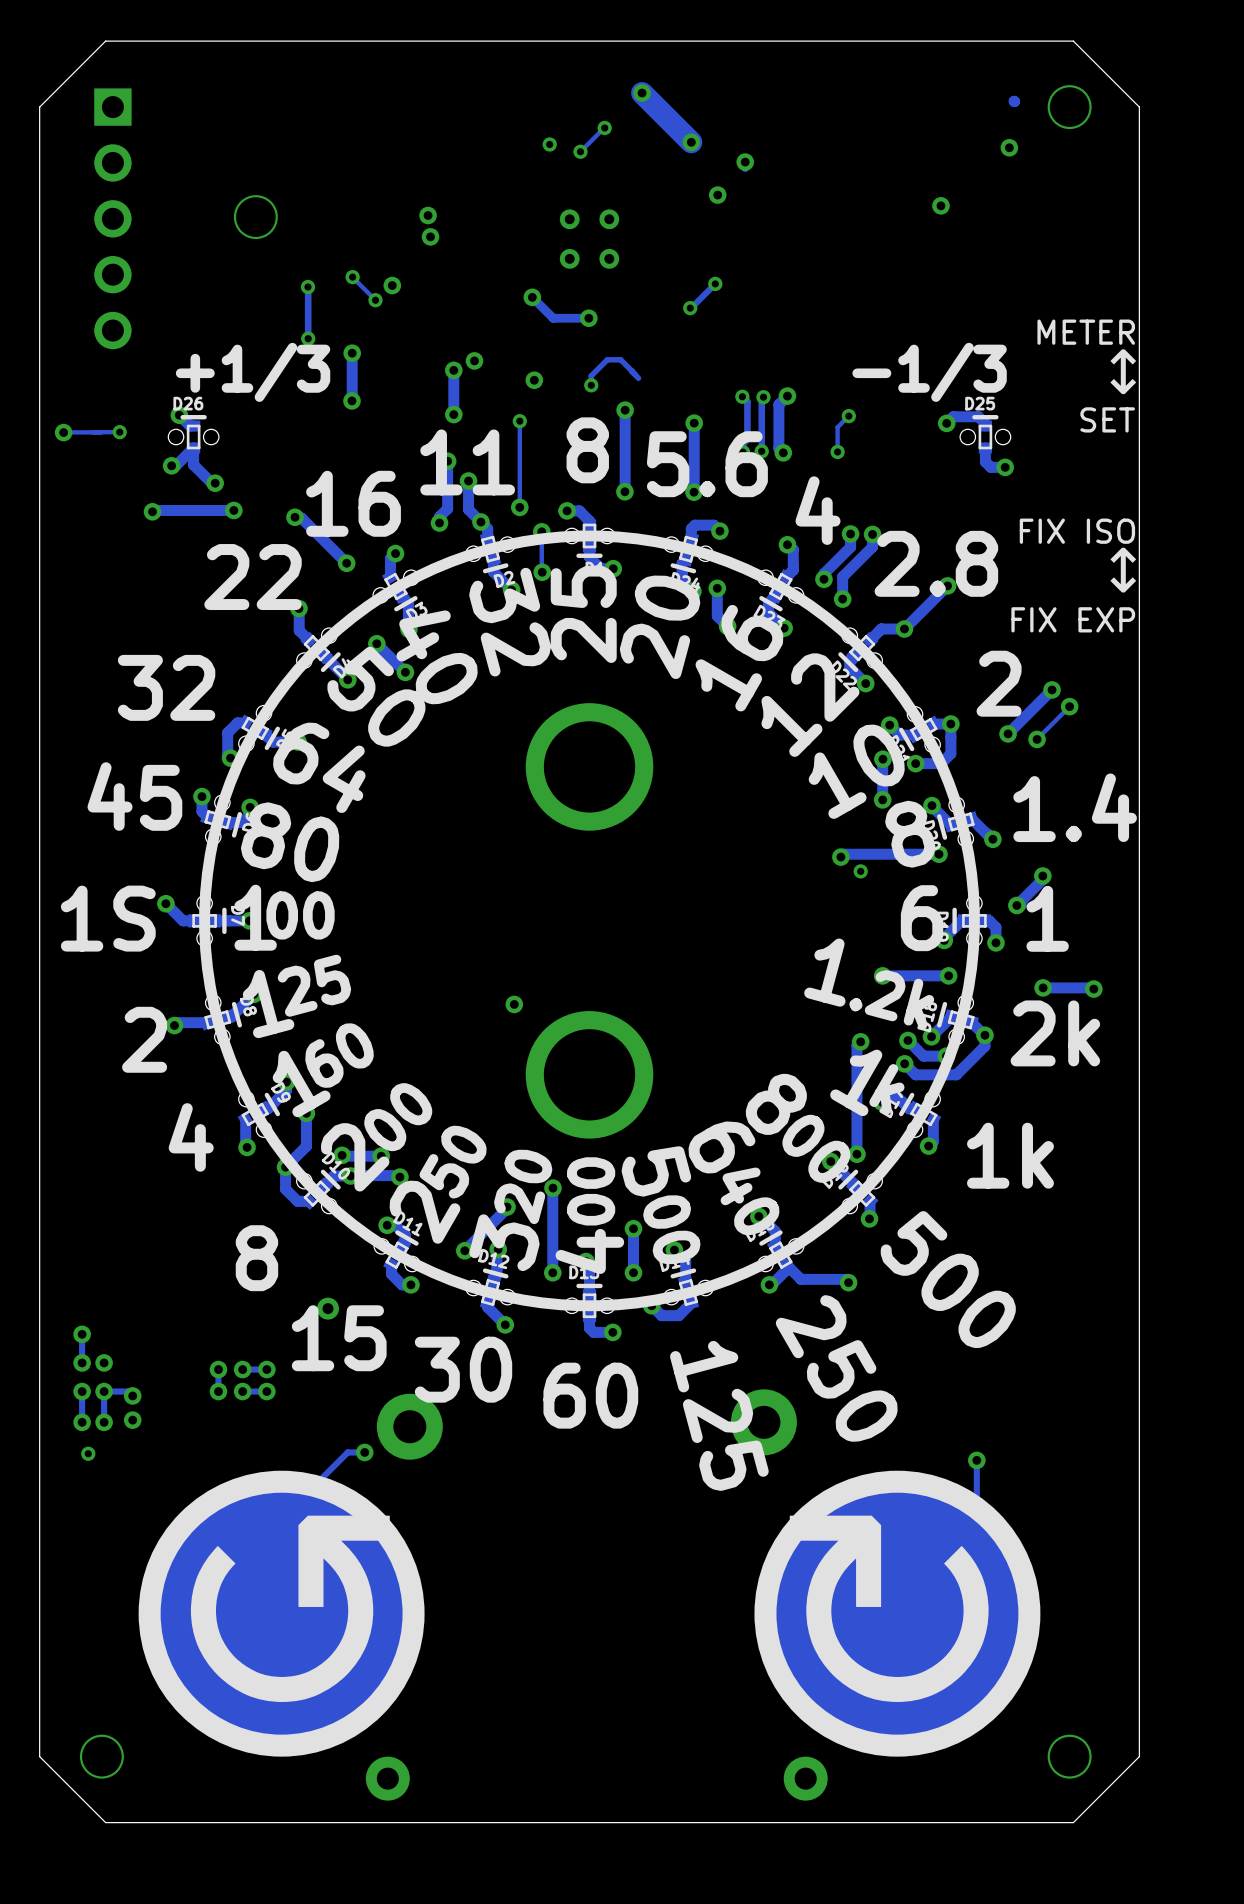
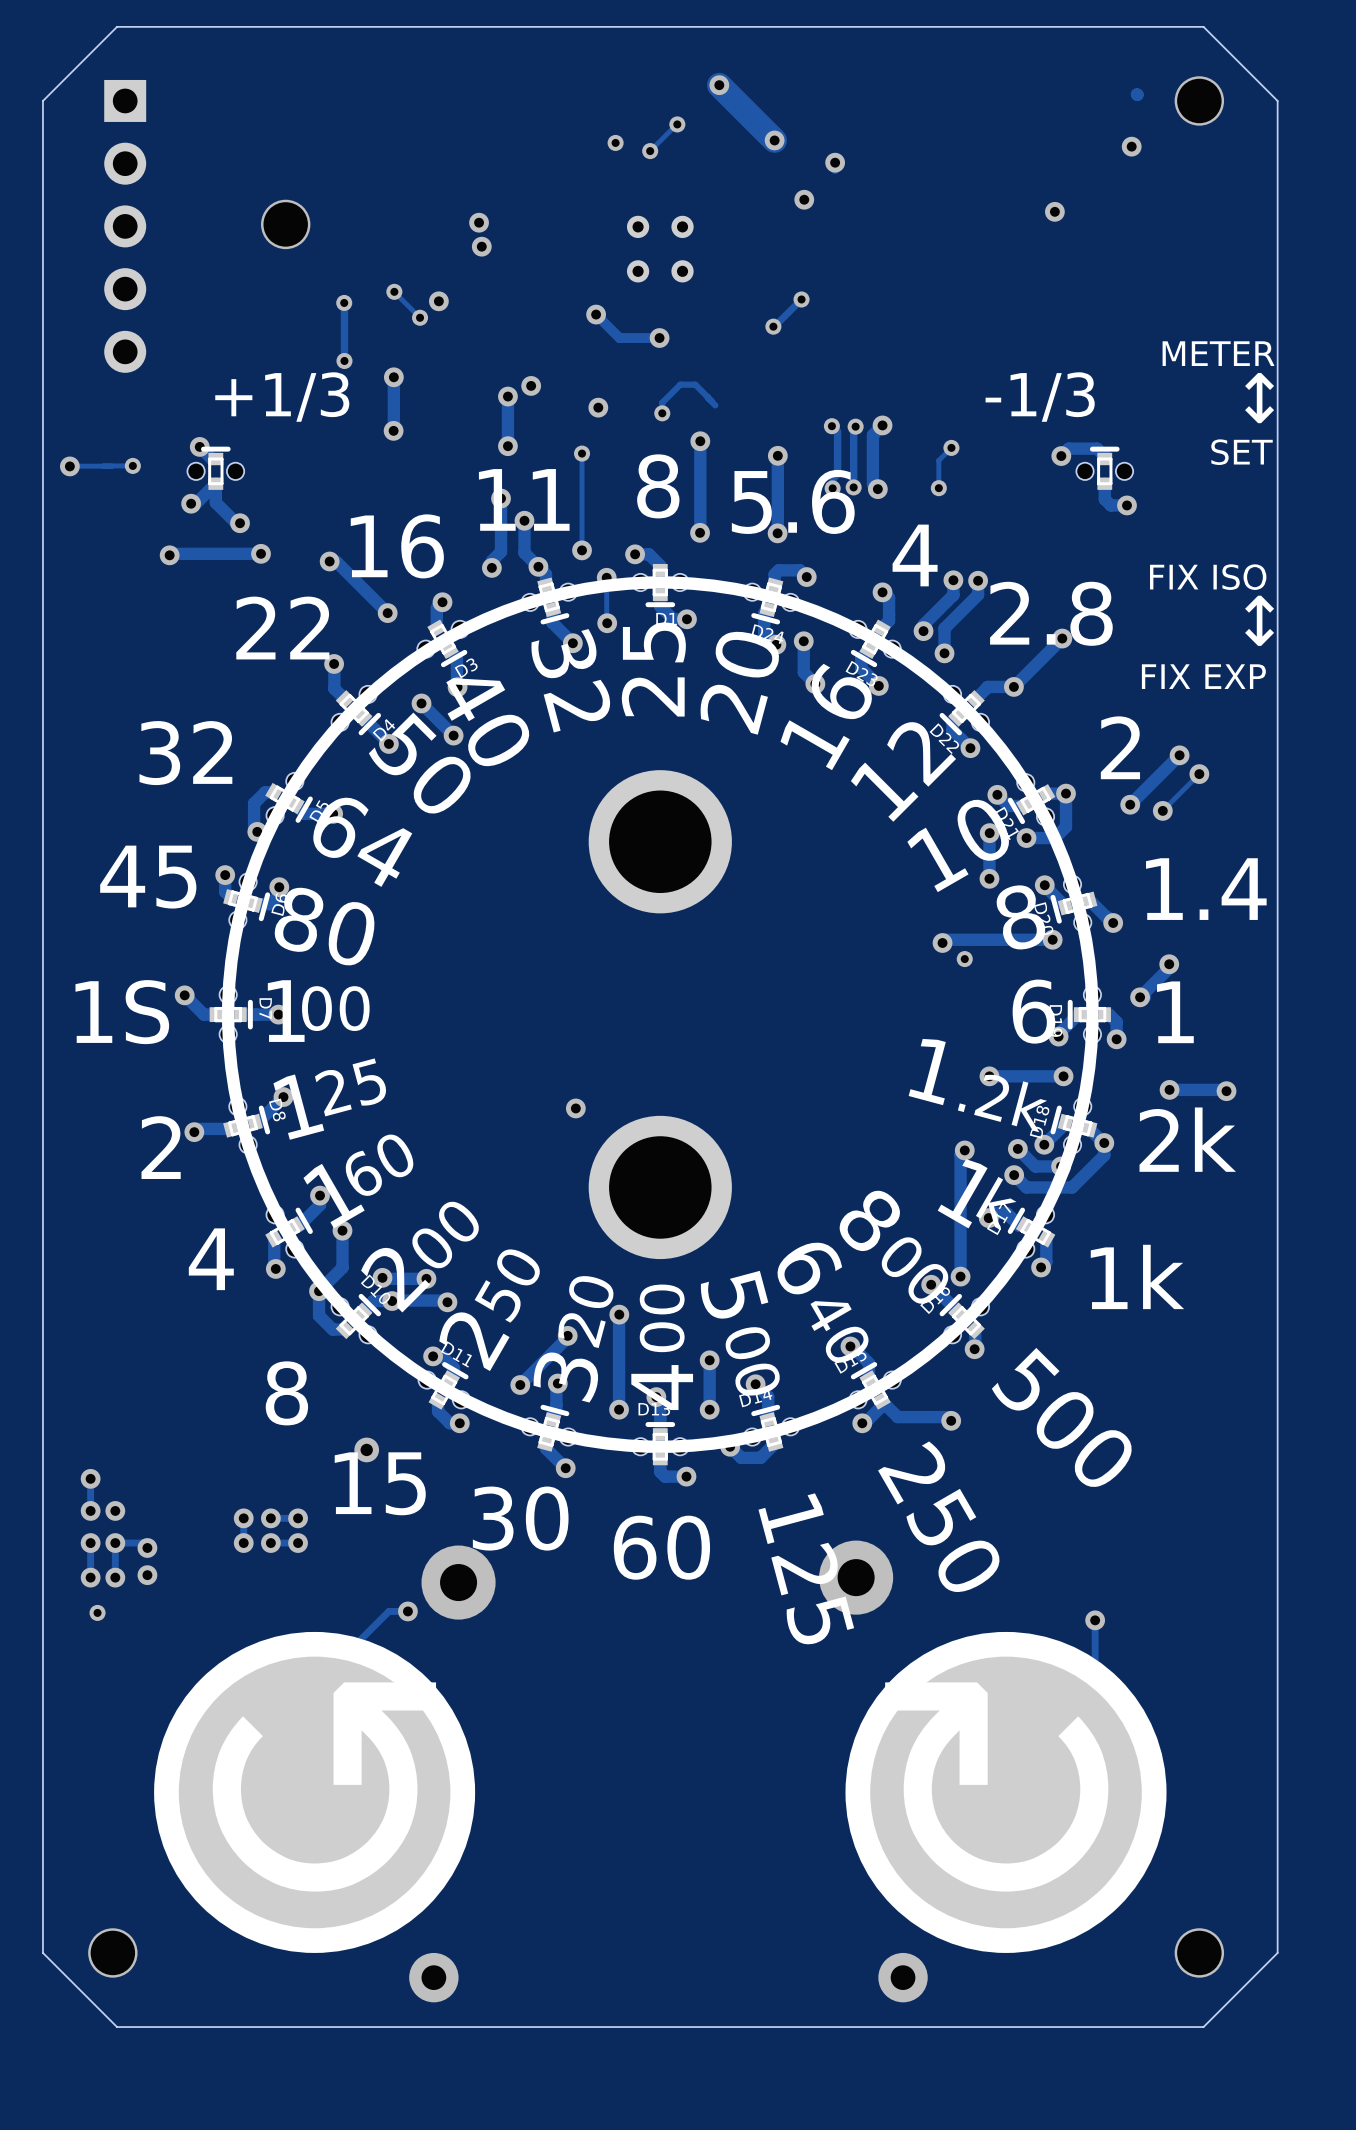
D26 name: D26 (188, 403) -> none
D25 name: D25 (980, 403) -> none
D2 name: D2 (504, 579) -> none
D9 name: D9 (281, 1092) -> none
D12 name: D12 (493, 1258) -> none

